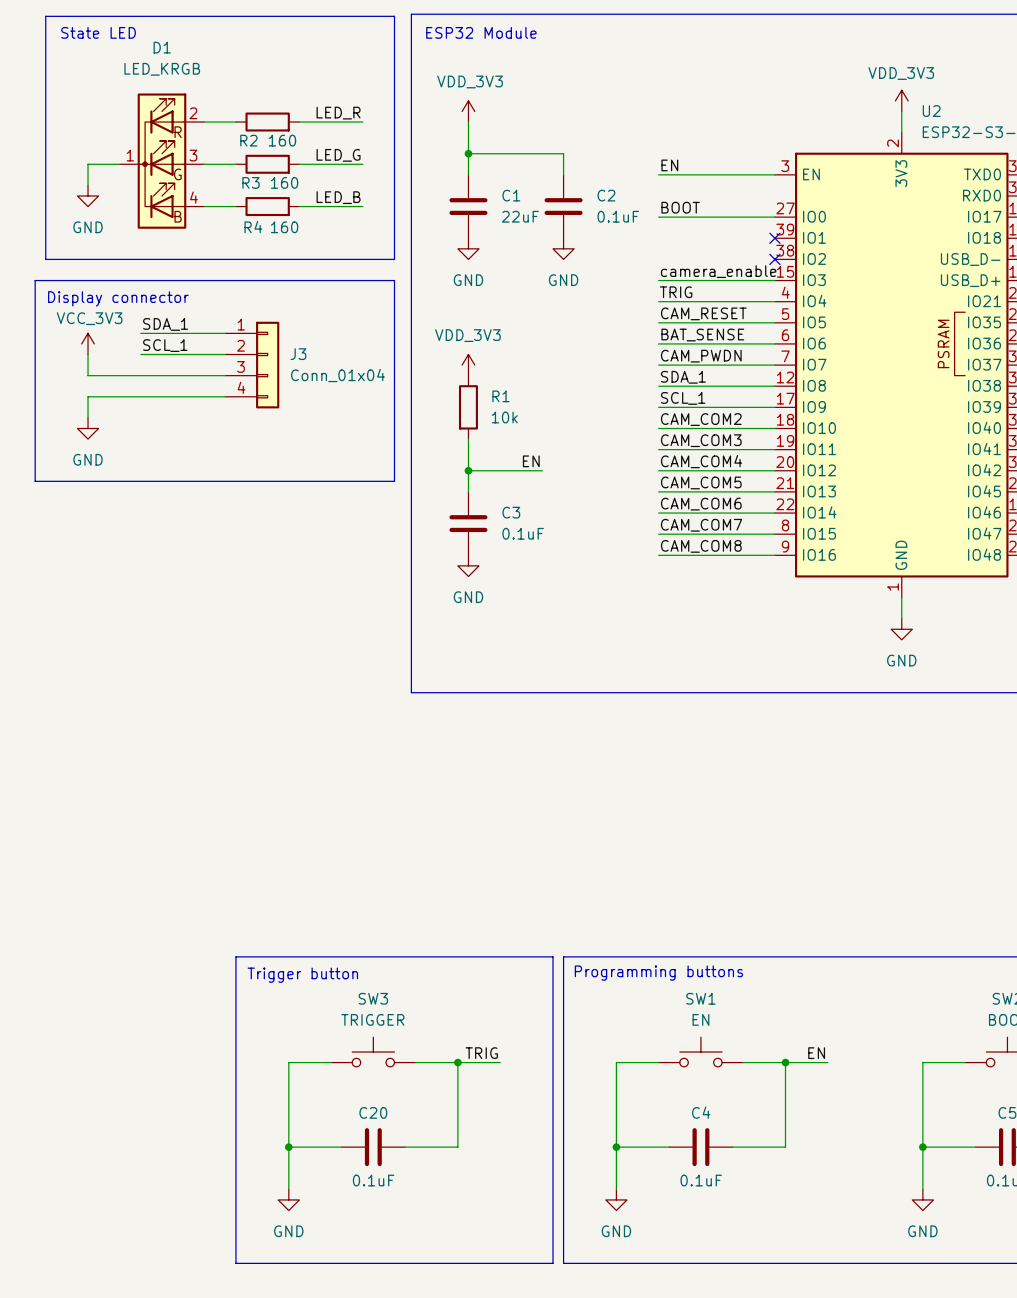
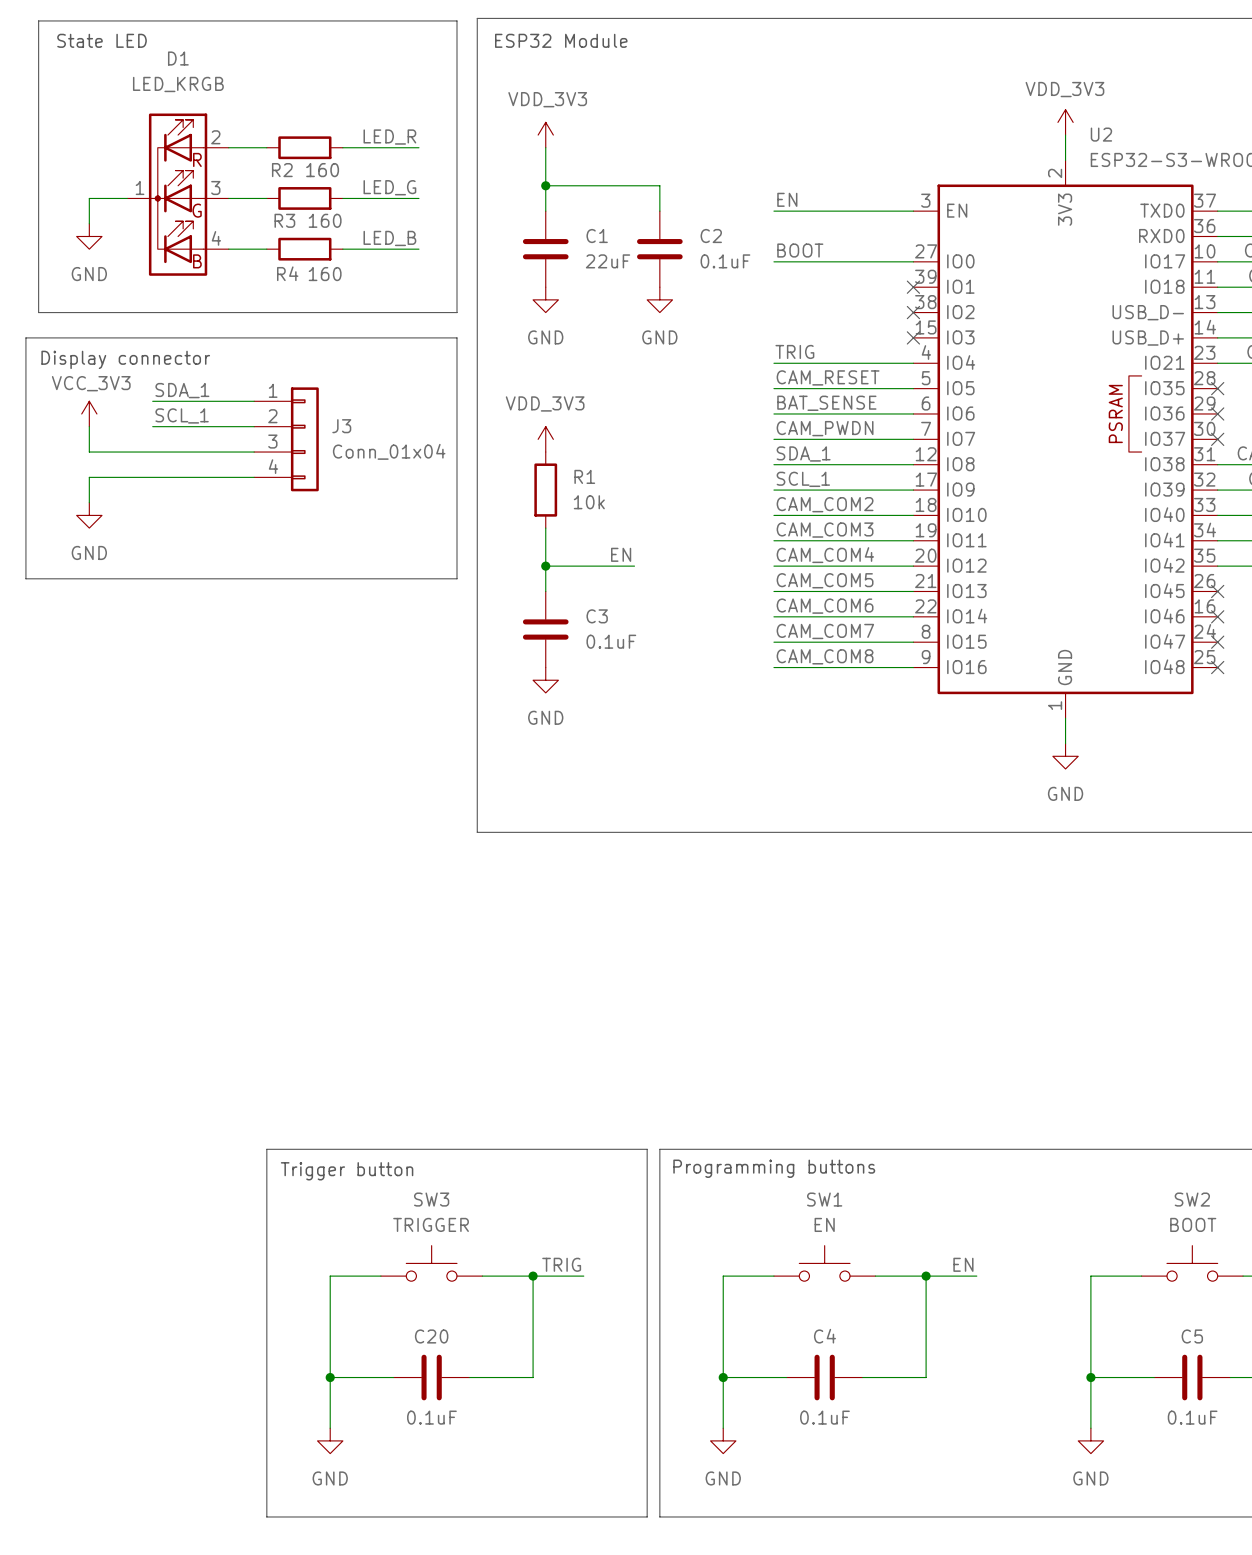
label: camera_enable (718, 271) -> none
wire: (658, 280) (774, 280) -> none
no-connect mark: none -> (913, 337)

